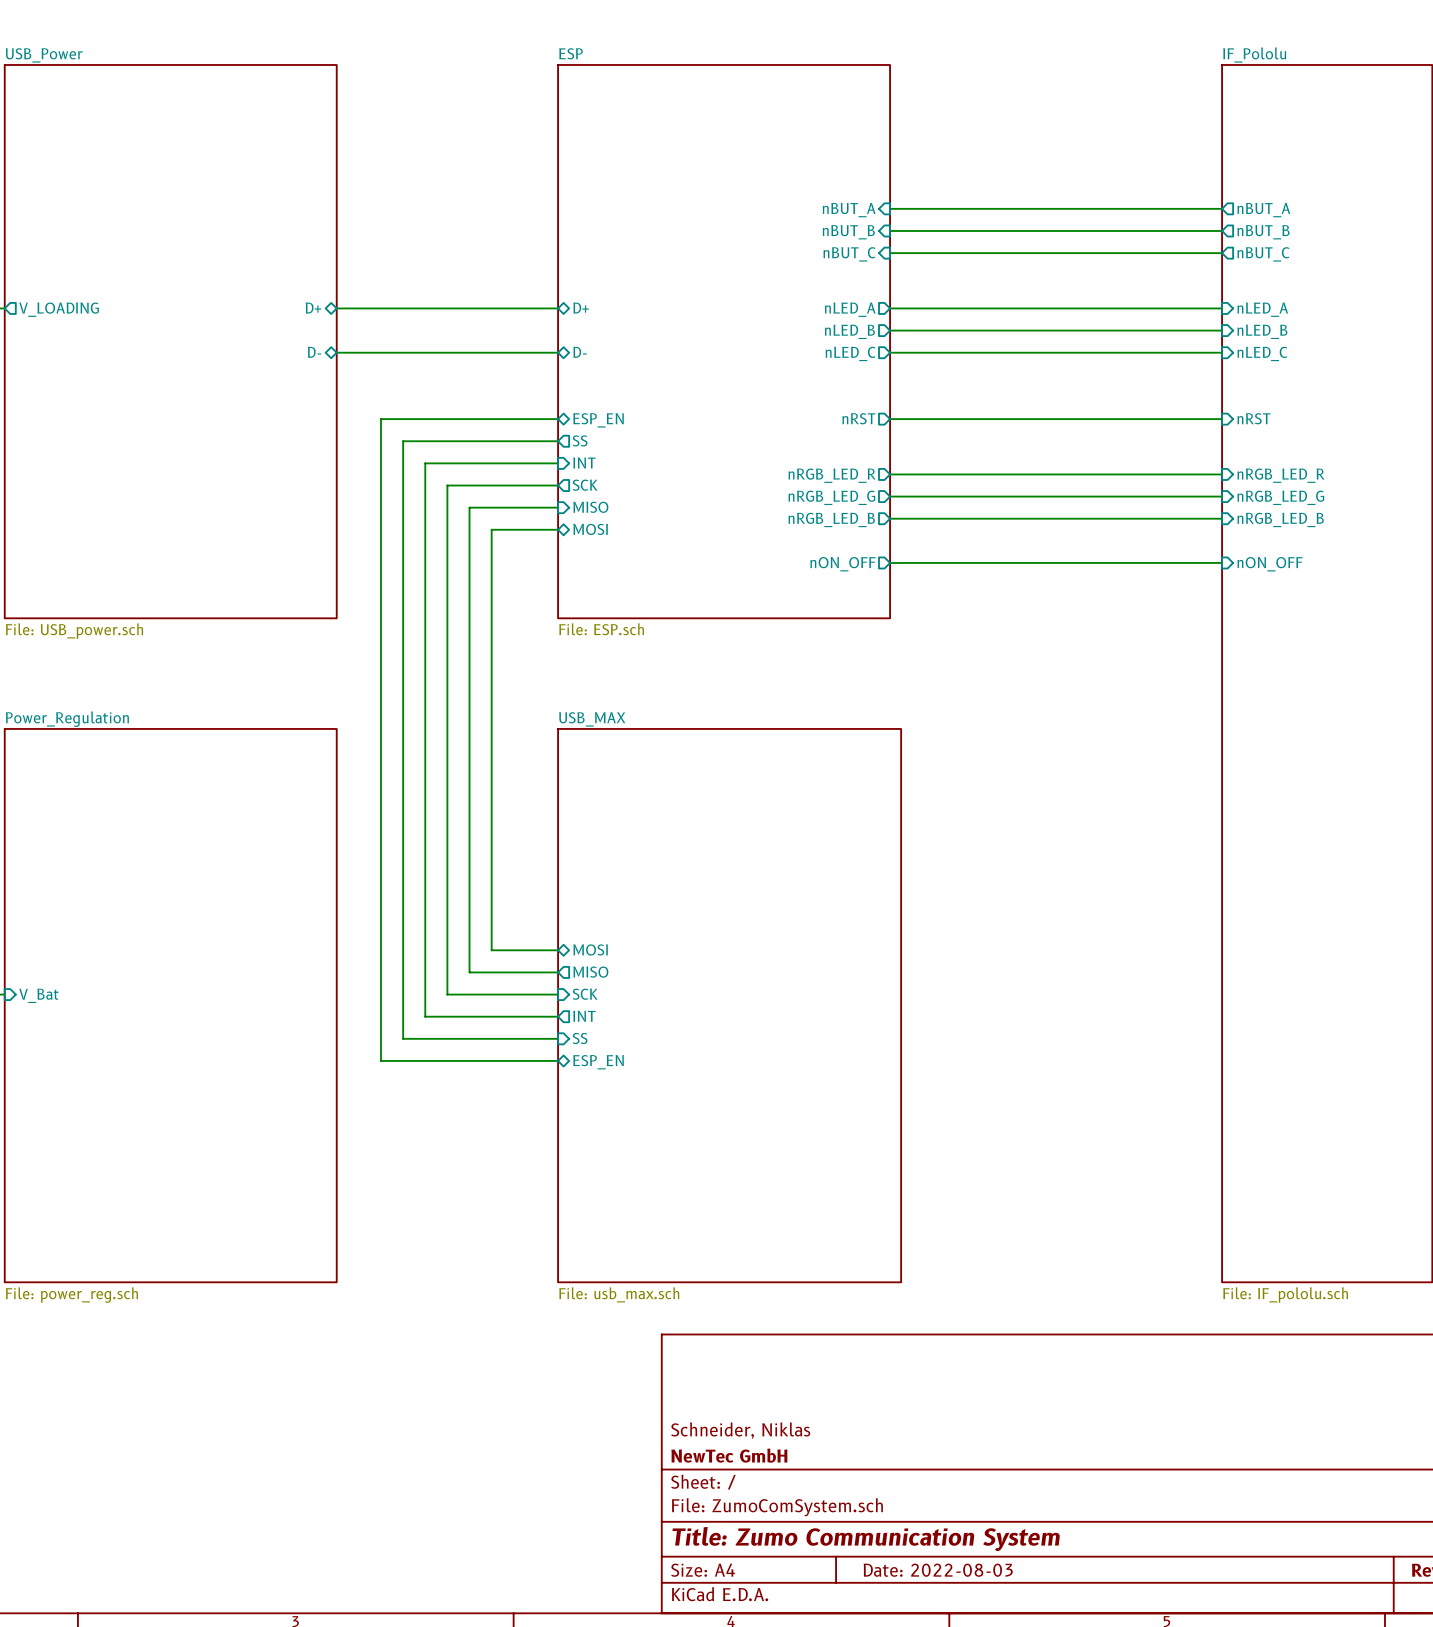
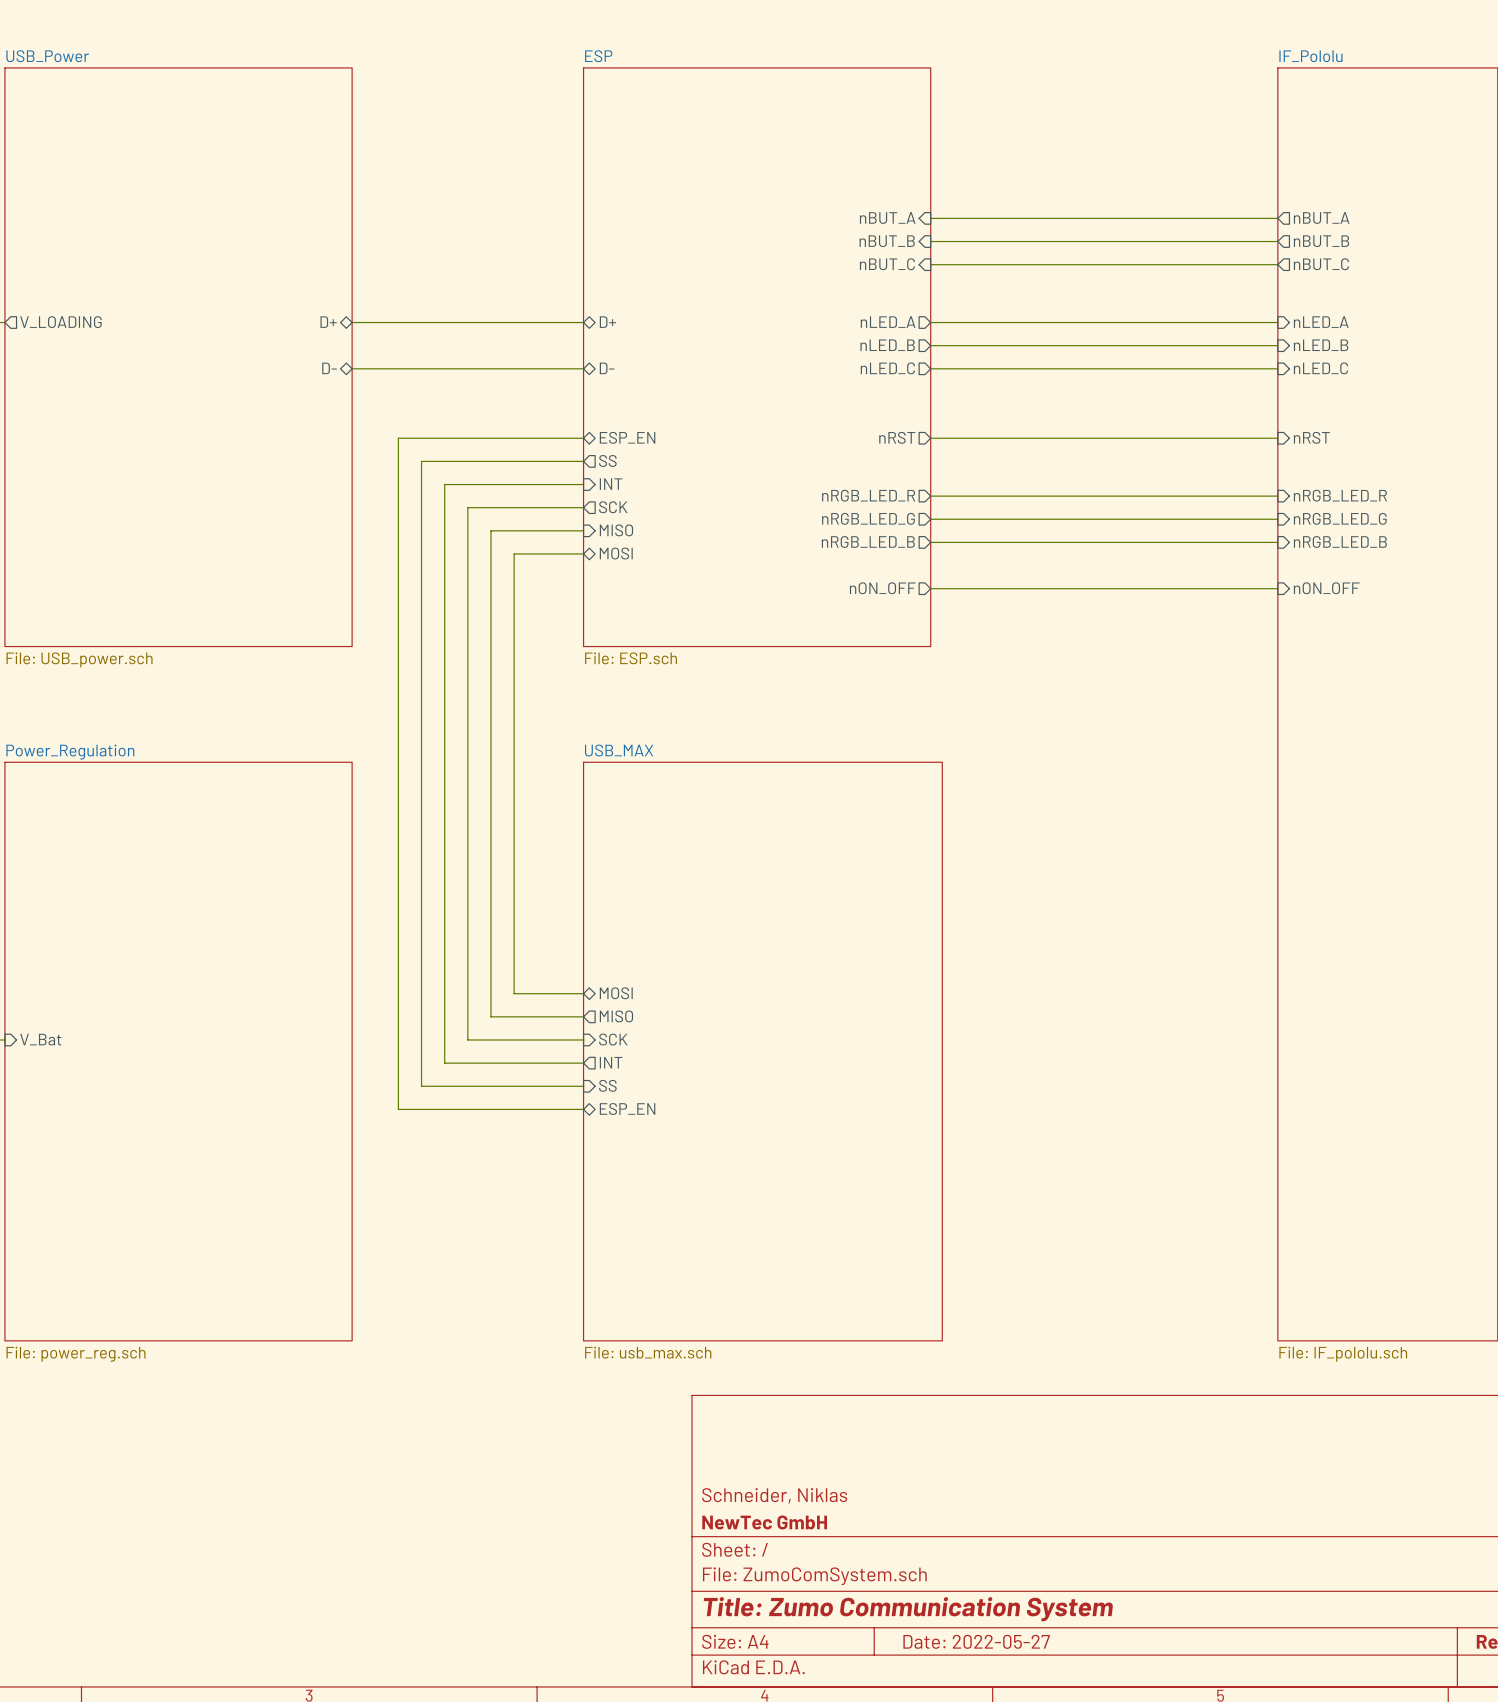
title block: Date: 2022-08-03 (938, 1570) -> Date: 2022-05-27 (976, 1641)

